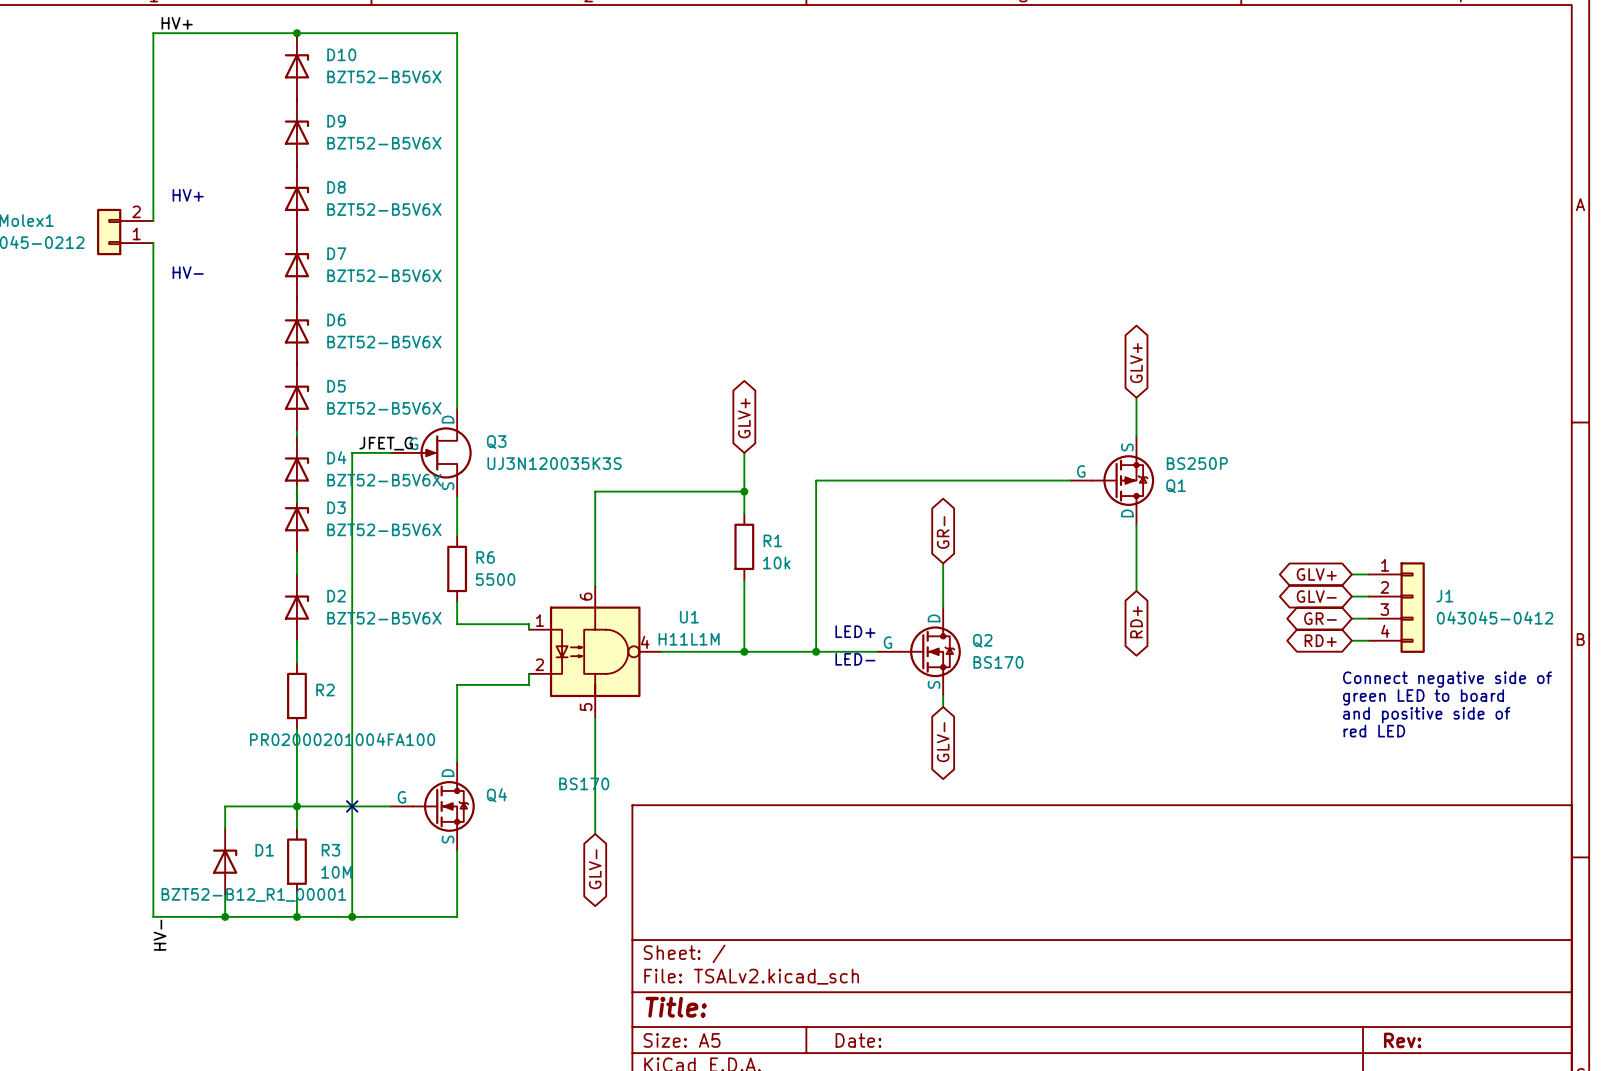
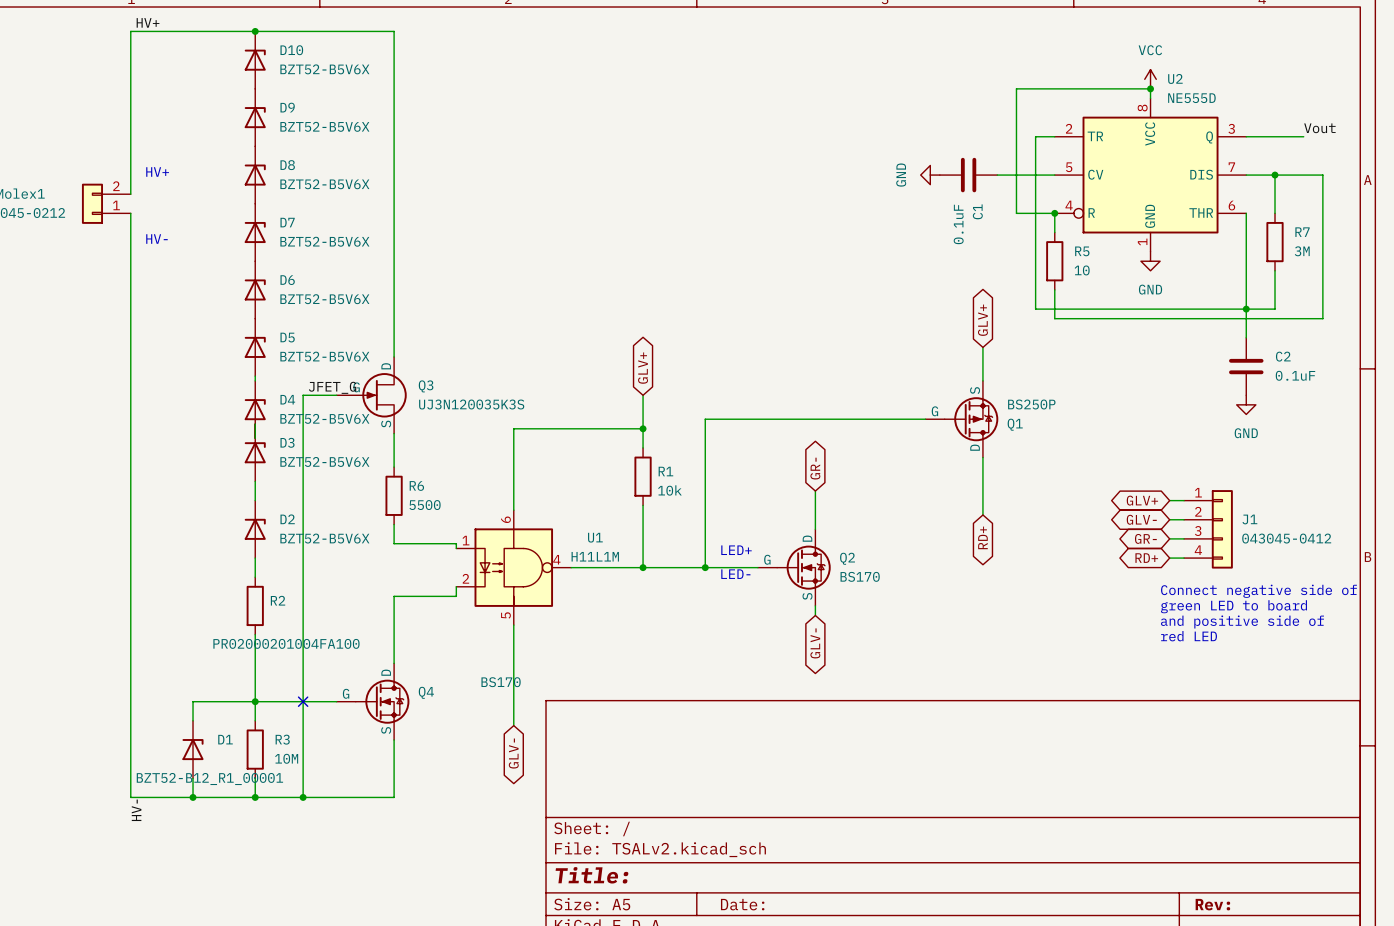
power symbol: none -> VCC (1150, 79)
junction: none -> (1150, 88)
wire: none -> (1150, 98) (1150, 88) (1016, 88) (1016, 213) (1054, 213) (1054, 232)
label: none -> Vout (1319, 128)
wire: none -> (1054, 136) (1035, 136) (1035, 309) (1275, 309) (1275, 270)
wire: none -> (1246, 136) (1303, 136)
power symbol: none -> GND (930, 175)
C1: none -> 0.1uF (968, 175)
wire: none -> (997, 175) (1054, 175)
U2: none -> NE555D (1150, 175)
wire: none -> (1246, 175) (1322, 175) (1322, 318) (1054, 318) (1054, 289)
wire: none -> (1275, 175) (1275, 213)
junction: none -> (1275, 175)
junction: none -> (1054, 213)
wire: none -> (1246, 213) (1246, 337)
R7: none -> 3M (1275, 242)
R5: none -> 10 (1054, 261)
power symbol: none -> GND (1150, 261)
junction: none -> (1246, 309)
C2: none -> 0.1uF (1246, 366)
power symbol: none -> GND (1246, 404)

